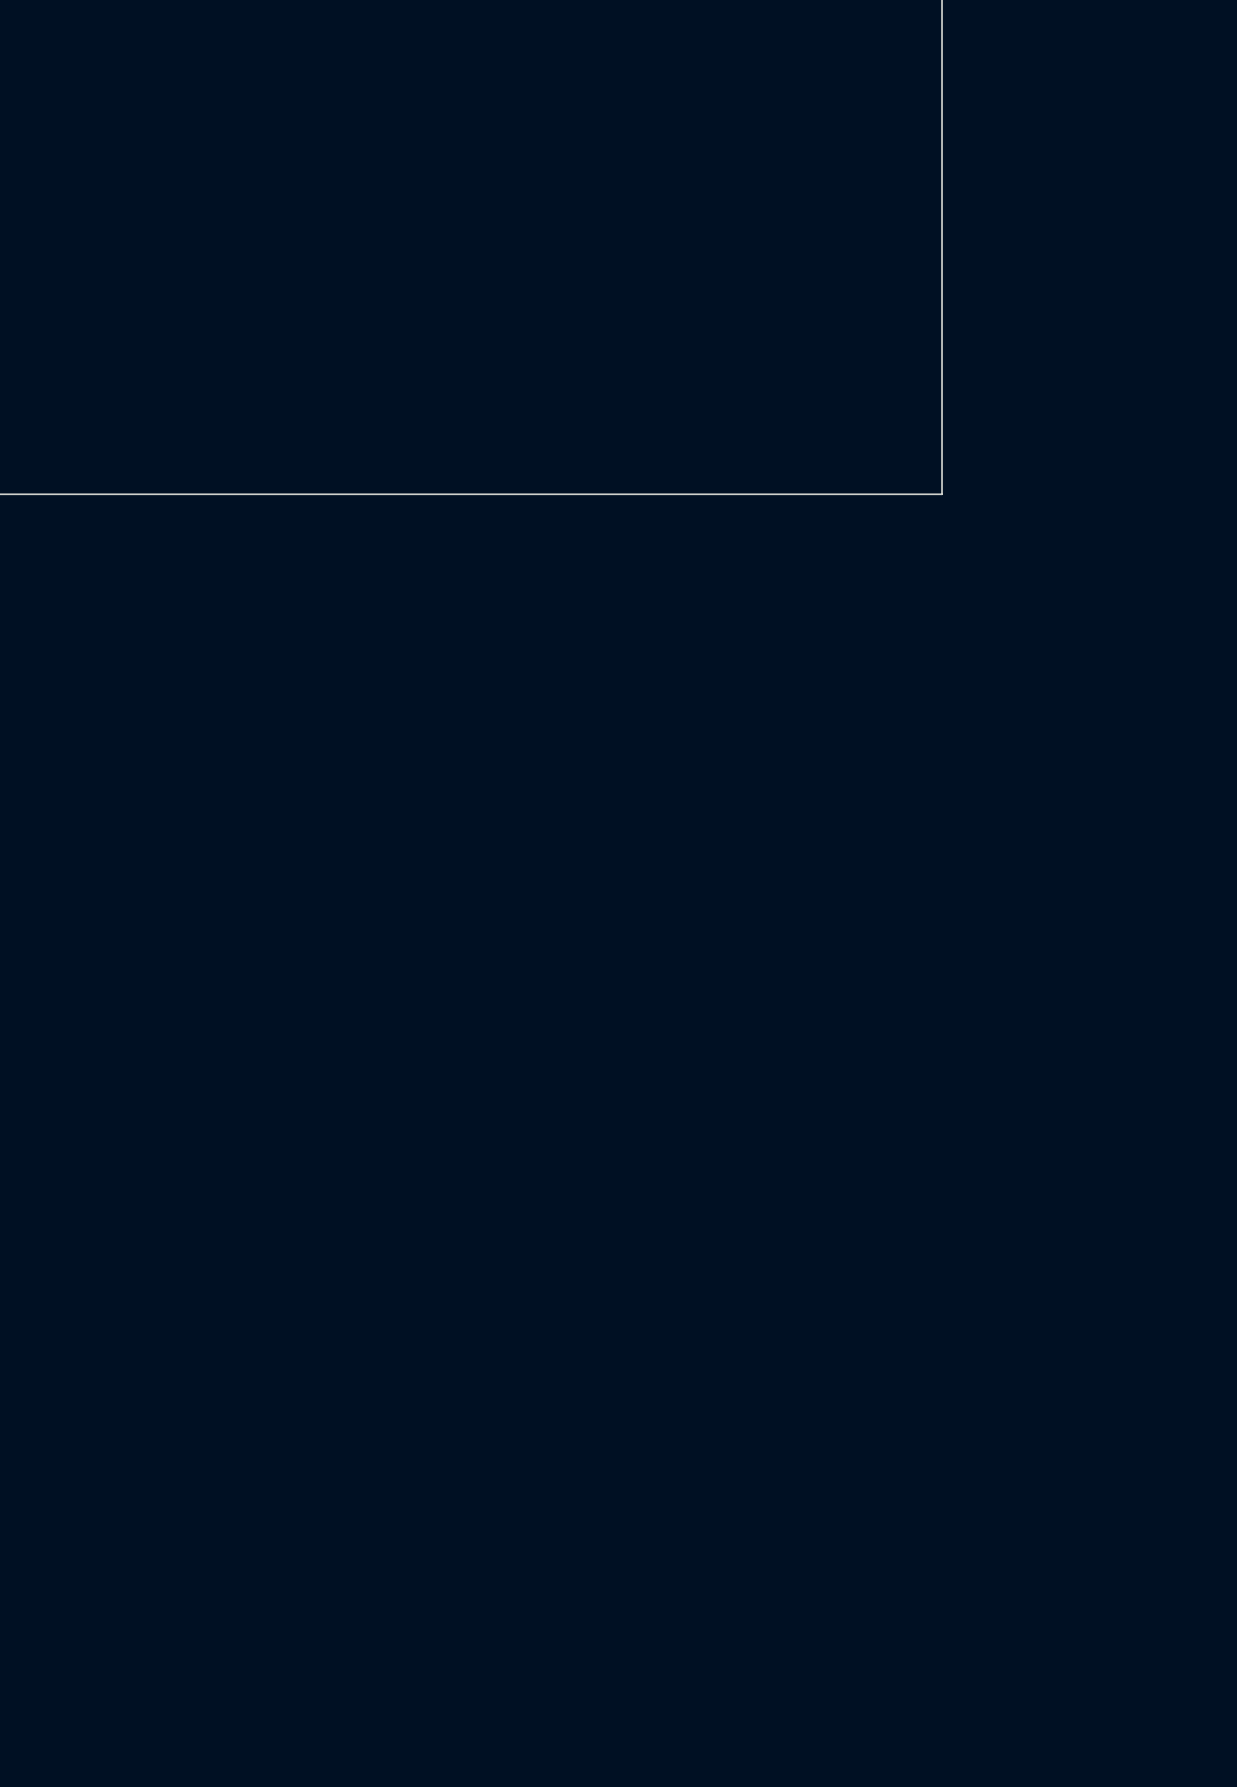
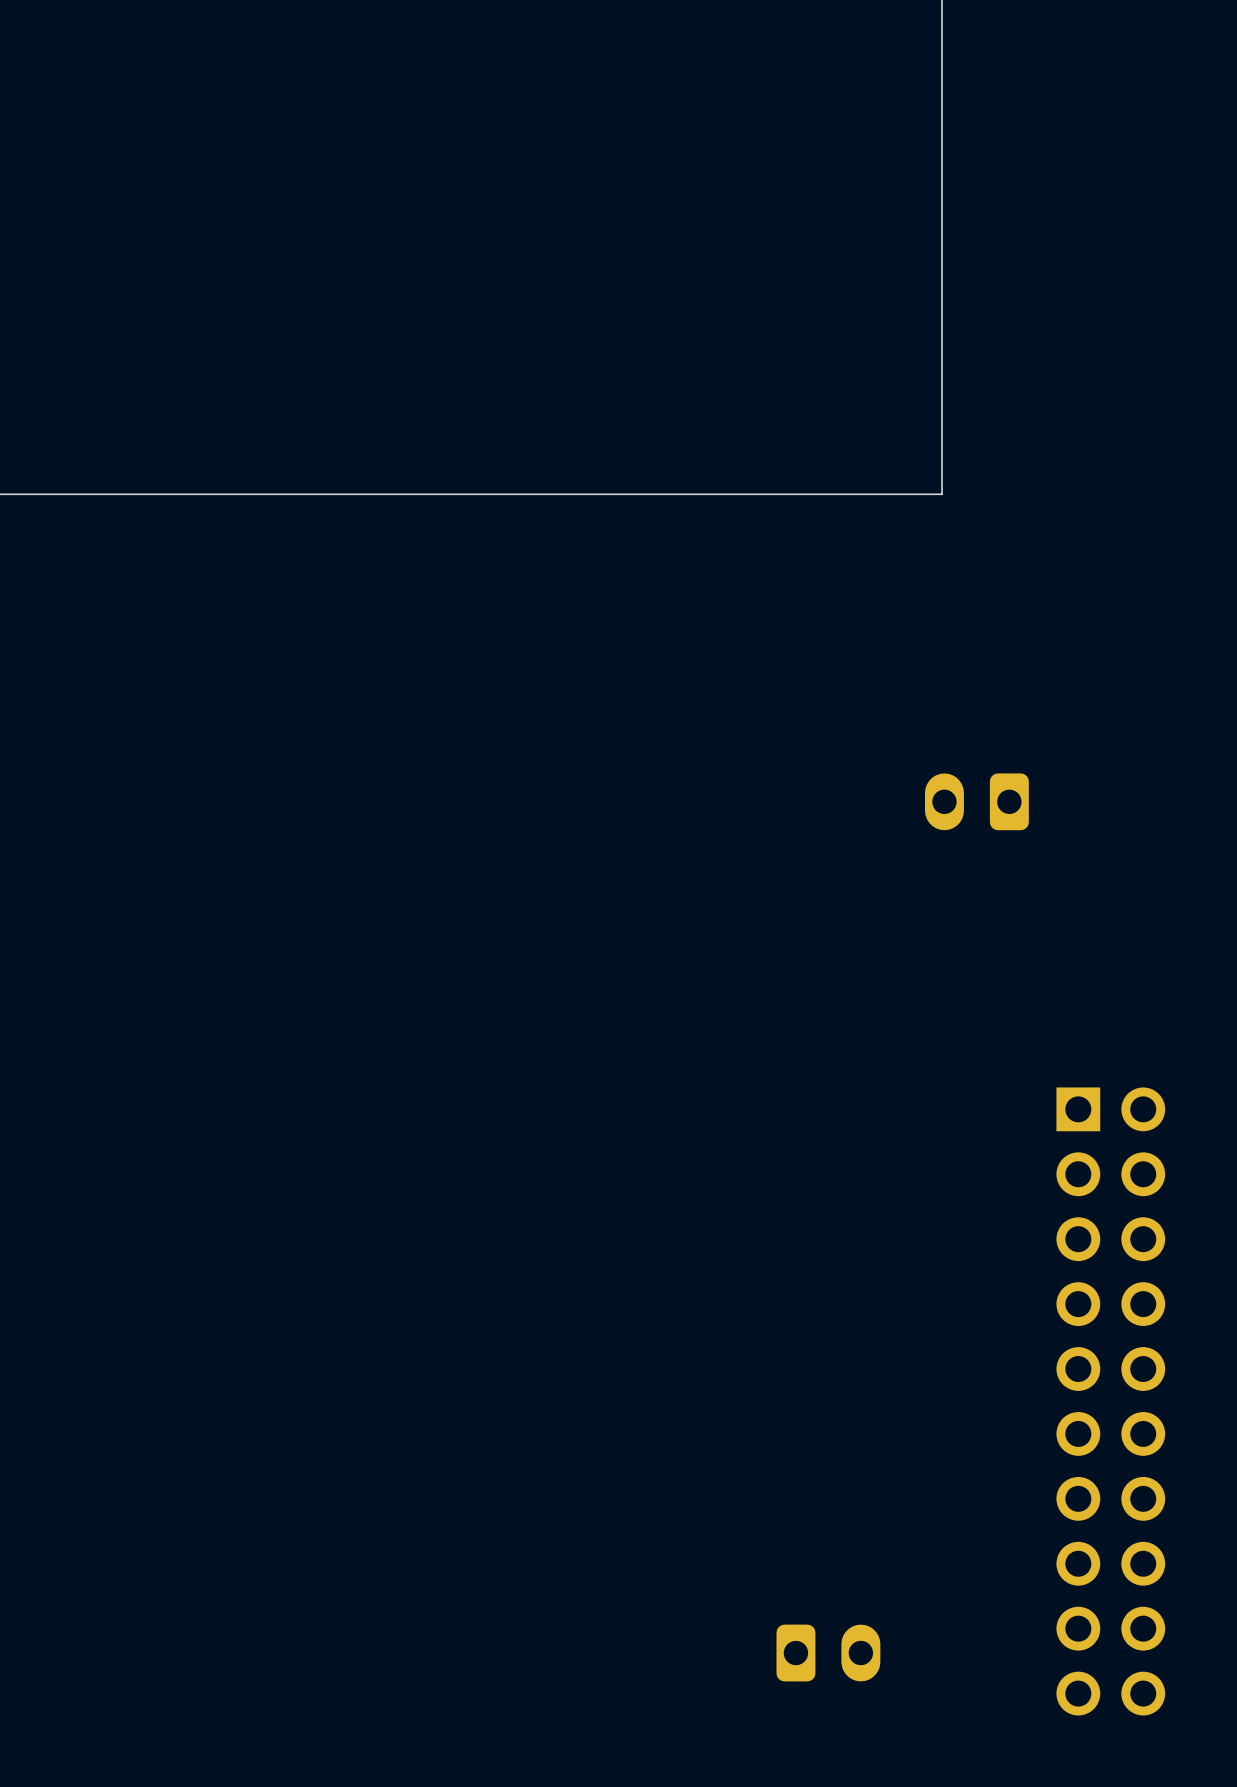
part: none -> (976, 801)
part: none -> (1110, 1401)
part: none -> (828, 1653)

